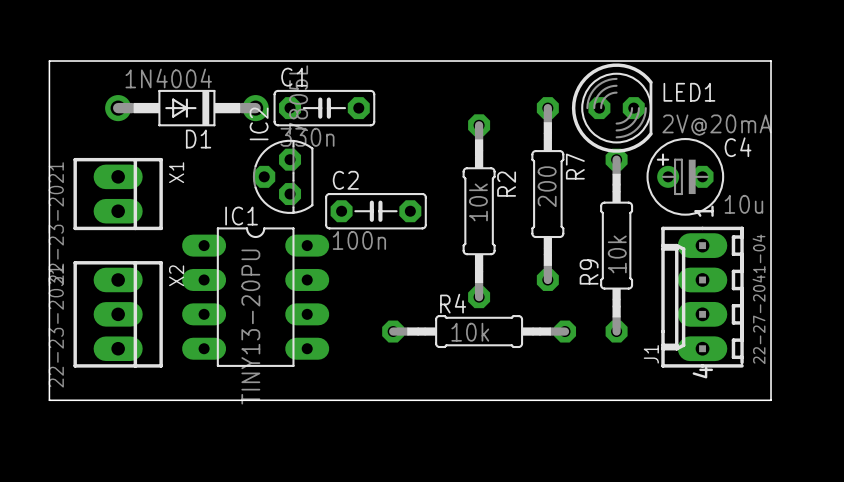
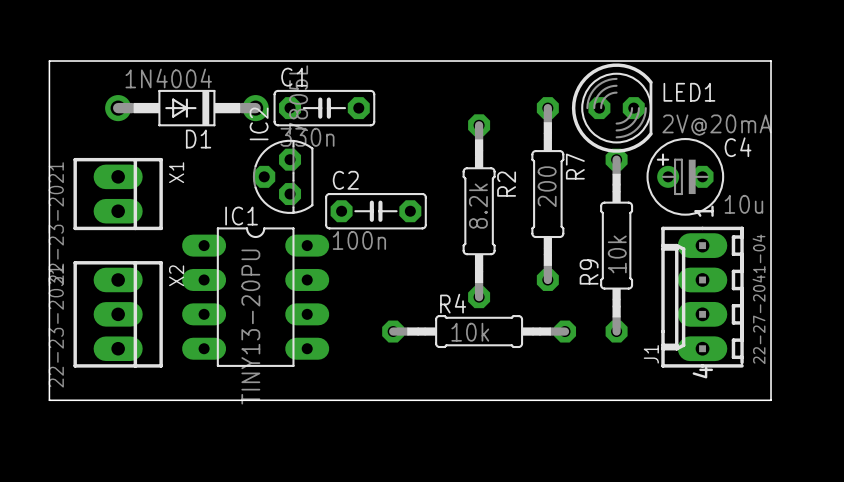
R2 value: 10k (478, 202) -> 8.2k (478, 206)

